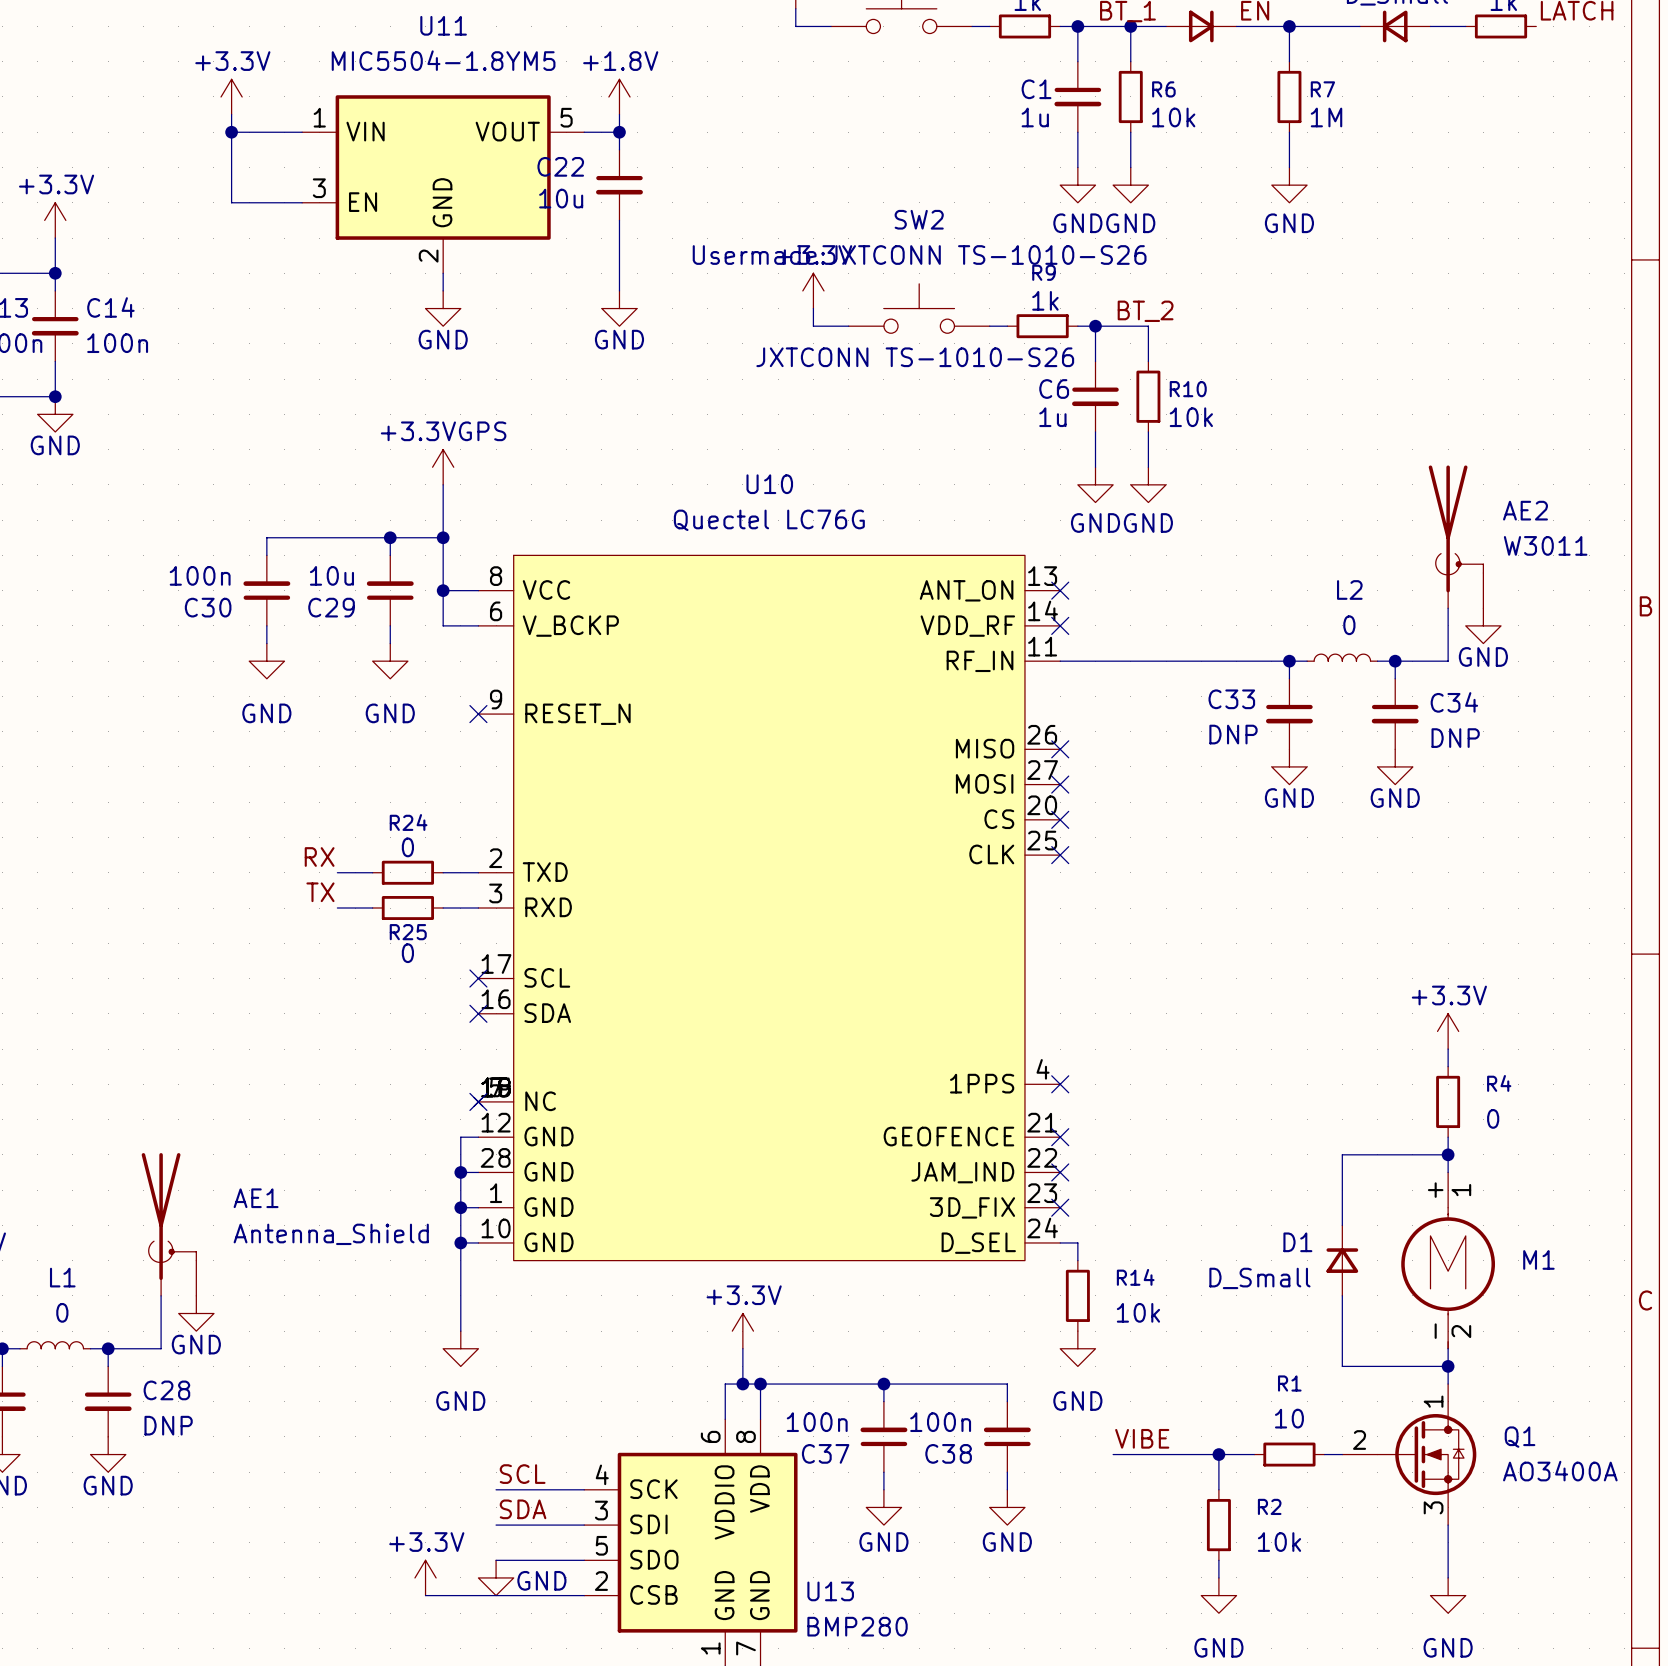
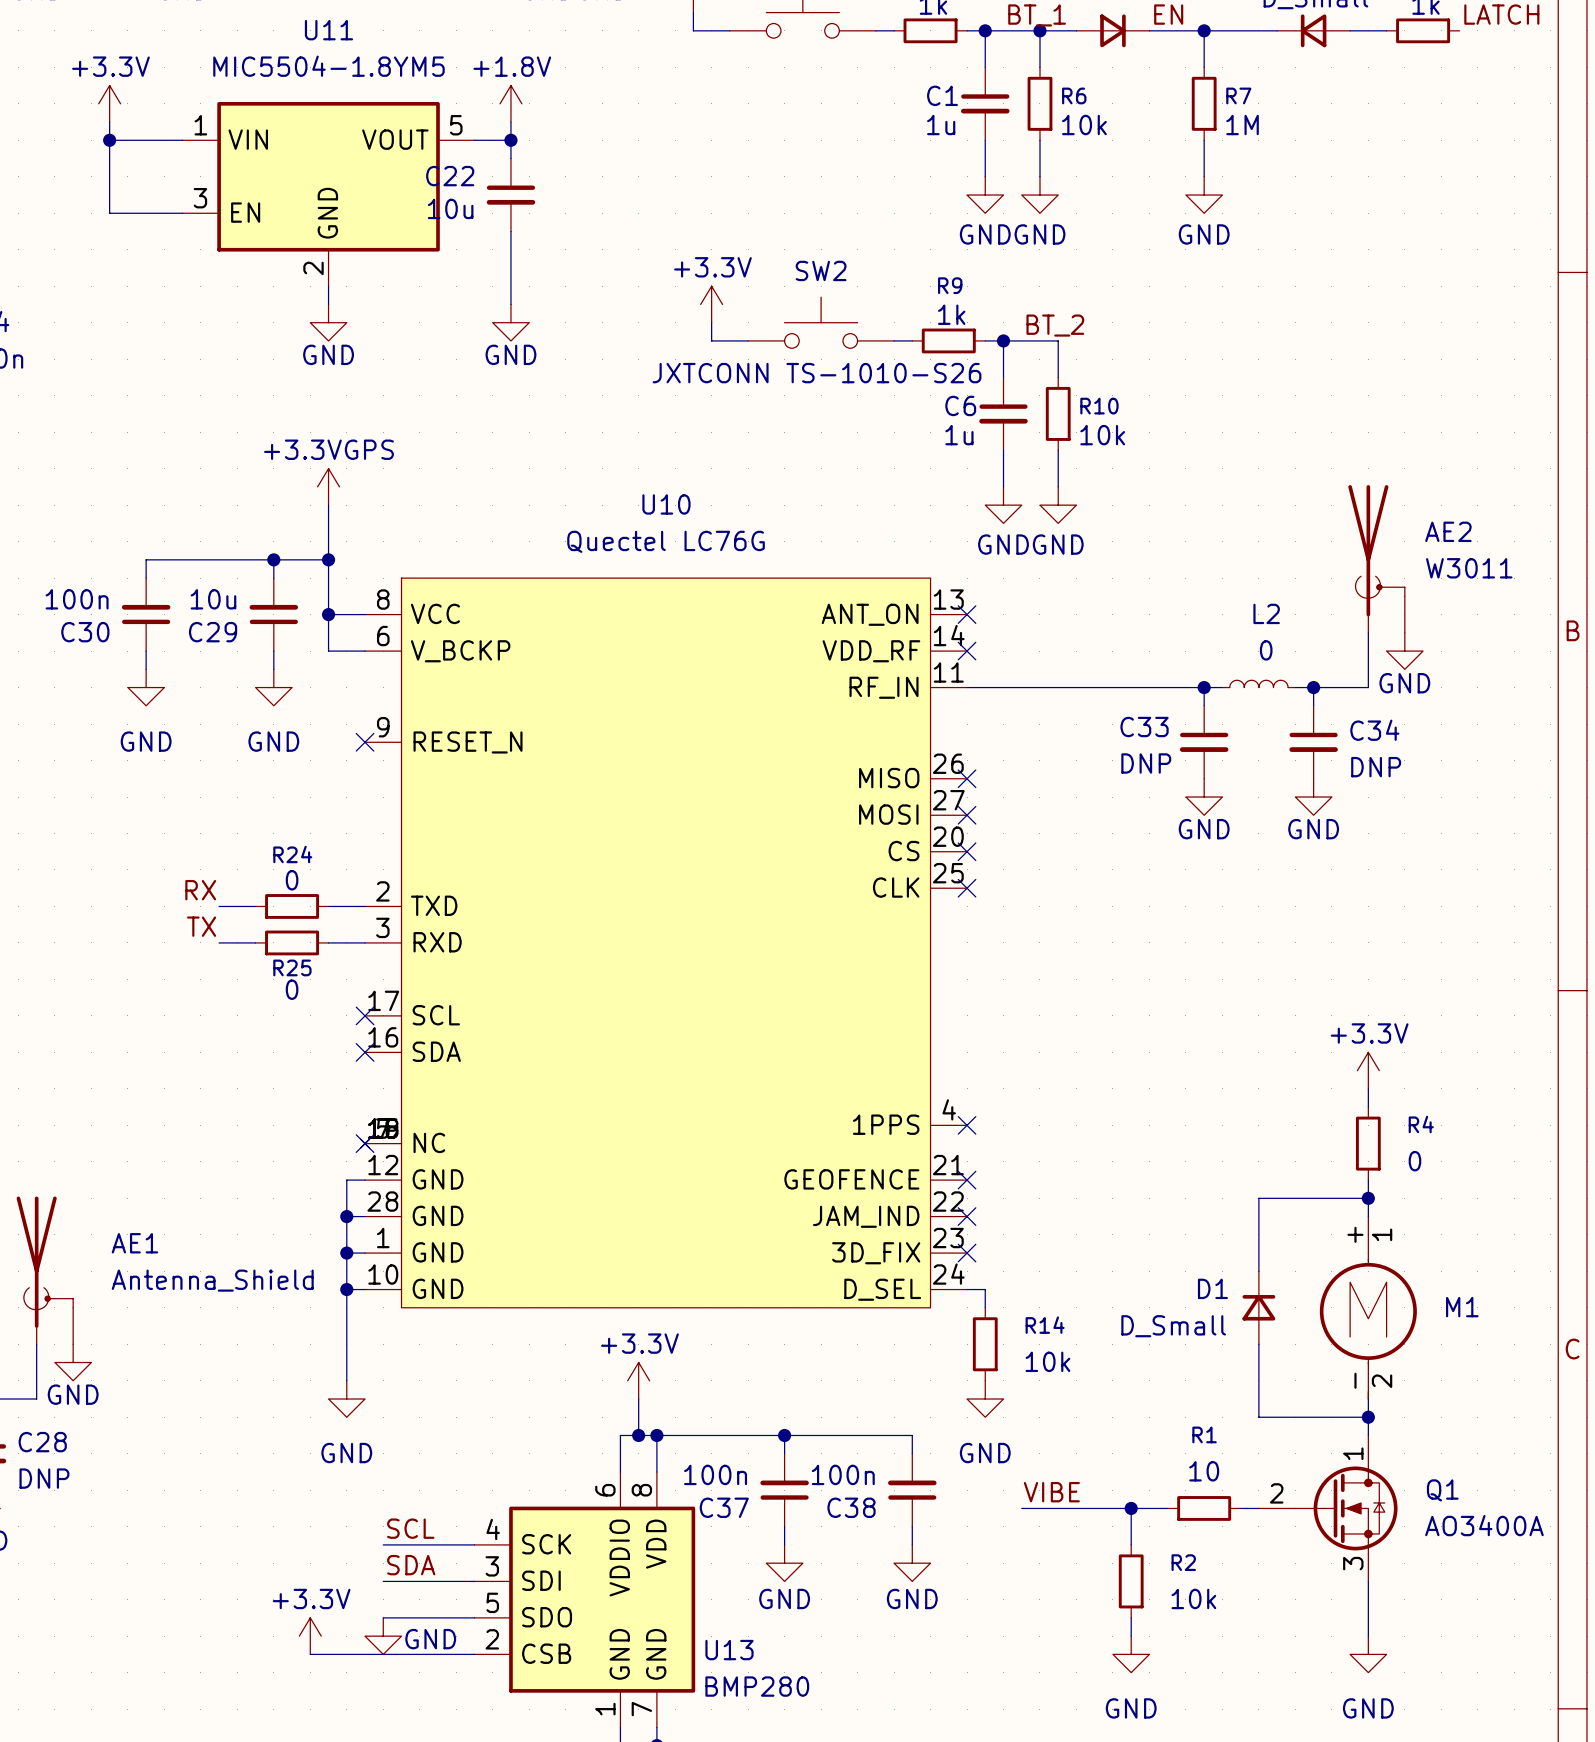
SW2 name position: SW2 (919, 219) -> SW2 (821, 270)
SW2 text: Usermade:JXTCONN TS-1010-S26 (919, 255) -> none

